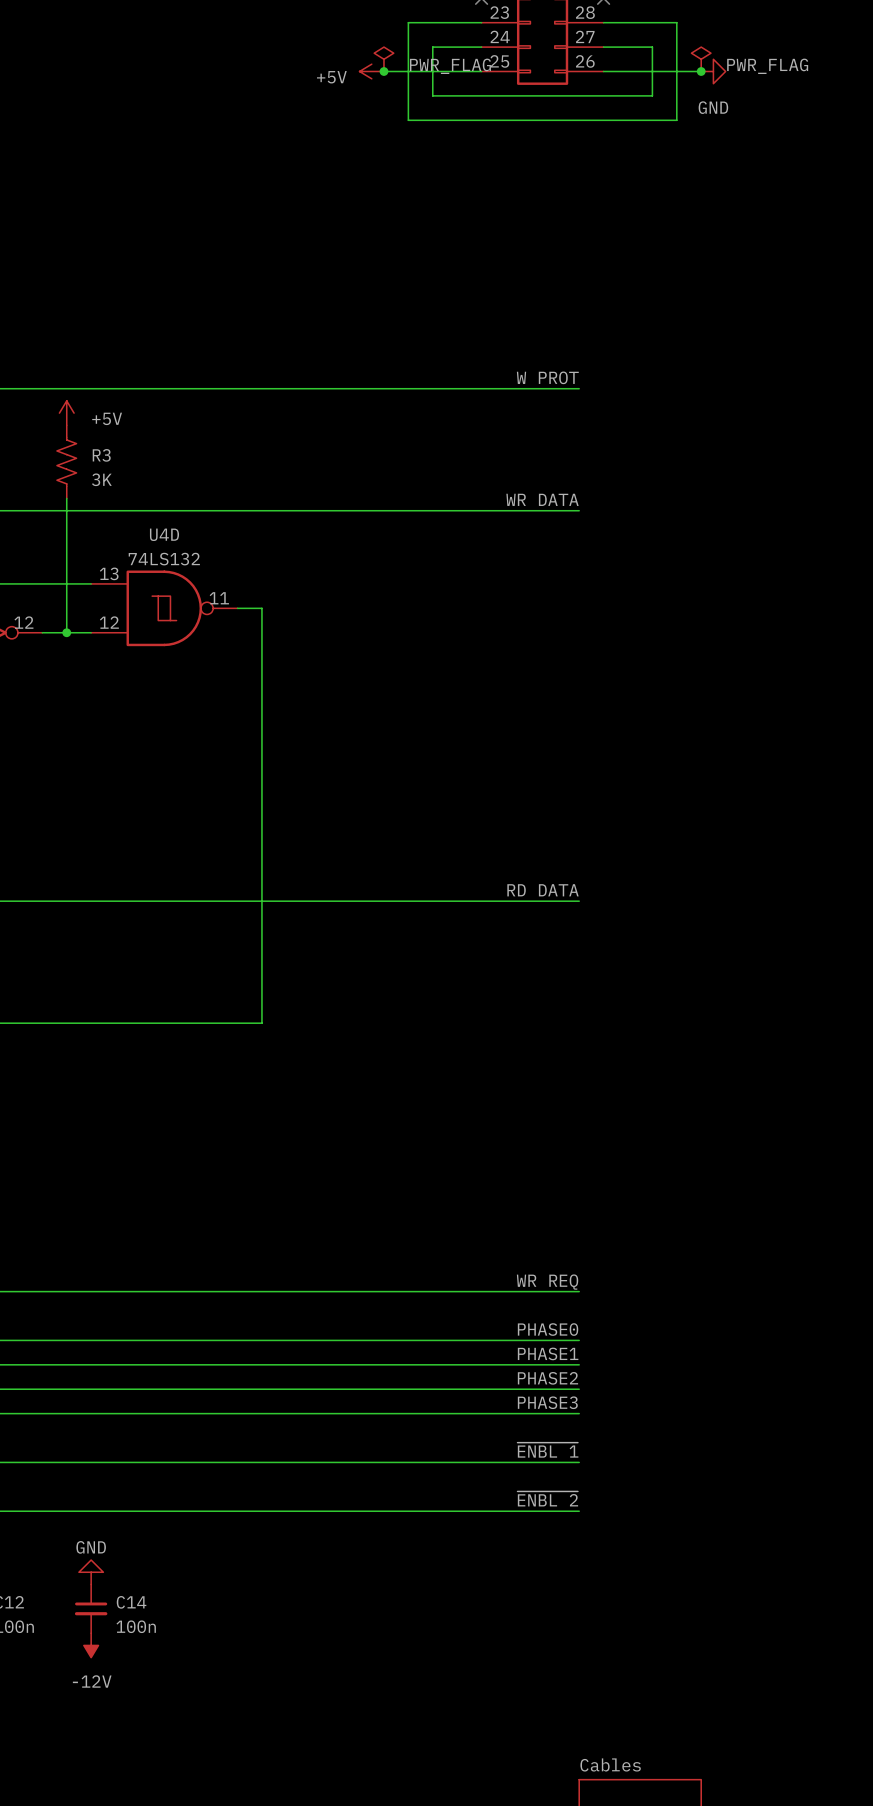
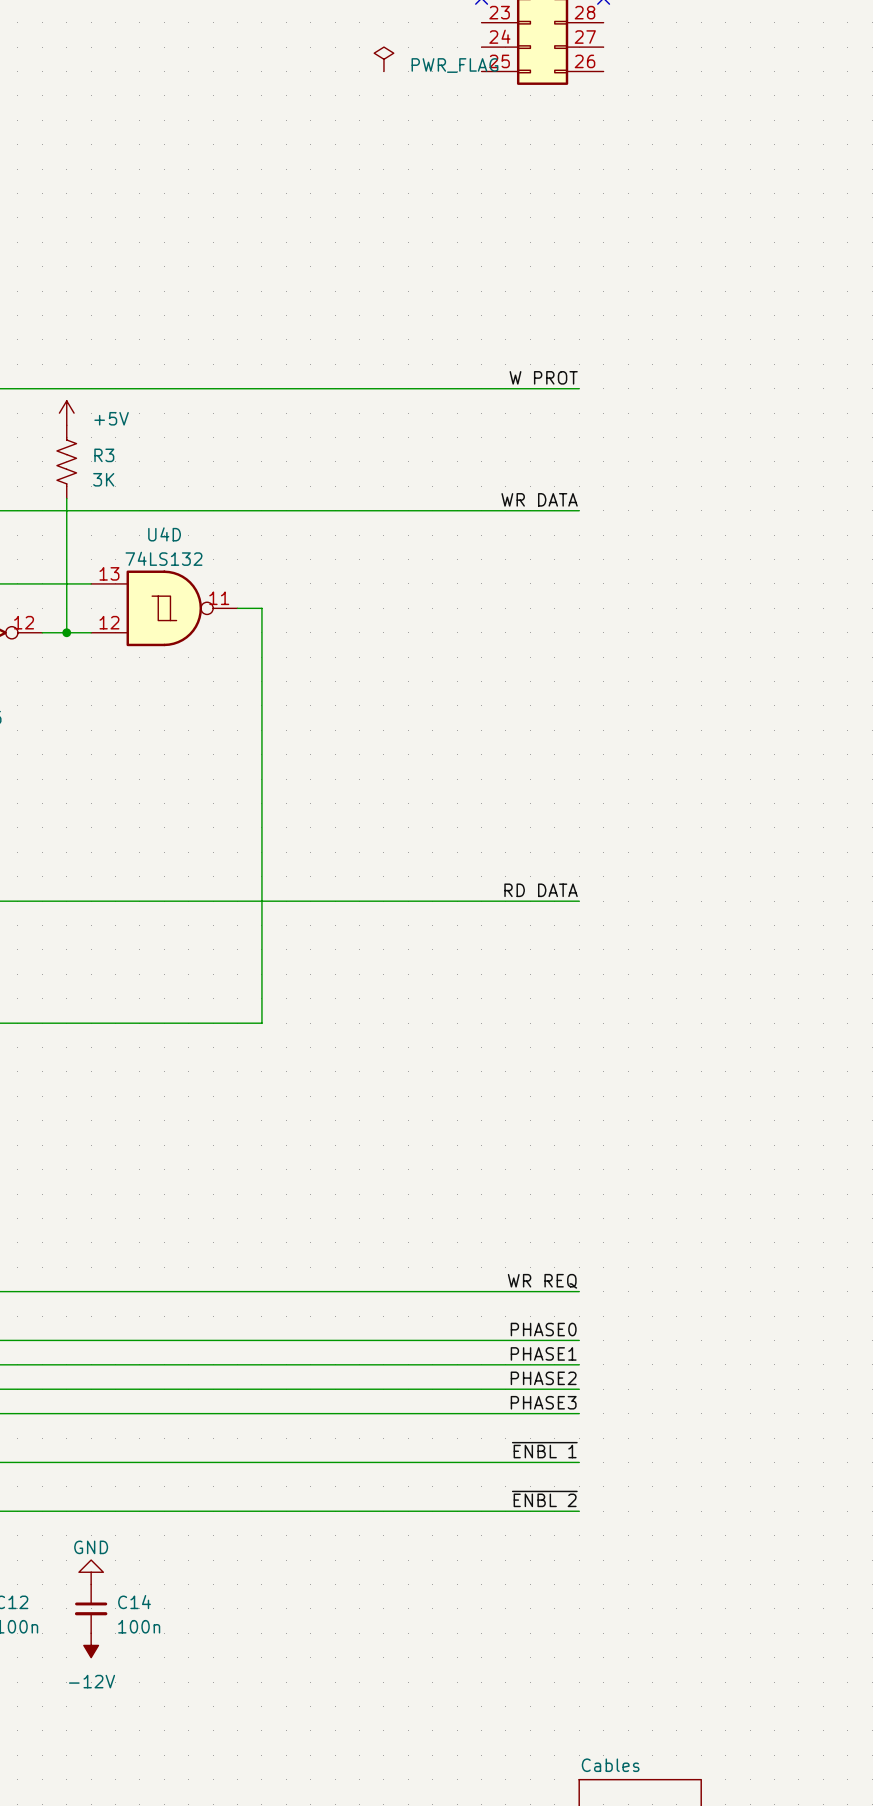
wire: (481, 22) (408, 22) (408, 120) (676, 120) (676, 22) (603, 22) -> none
wire: (481, 47) (432, 47) (432, 95) (652, 95) (652, 47) (603, 47) -> none
power symbol: PWR_FLAG (701, 59) -> none
power symbol: +5V (371, 71) -> none
wire: (383, 71) (481, 71) -> none
junction: (383, 71) -> none
wire: (603, 71) (701, 71) -> none
junction: (701, 71) -> none
power symbol: GND (713, 71) -> none

